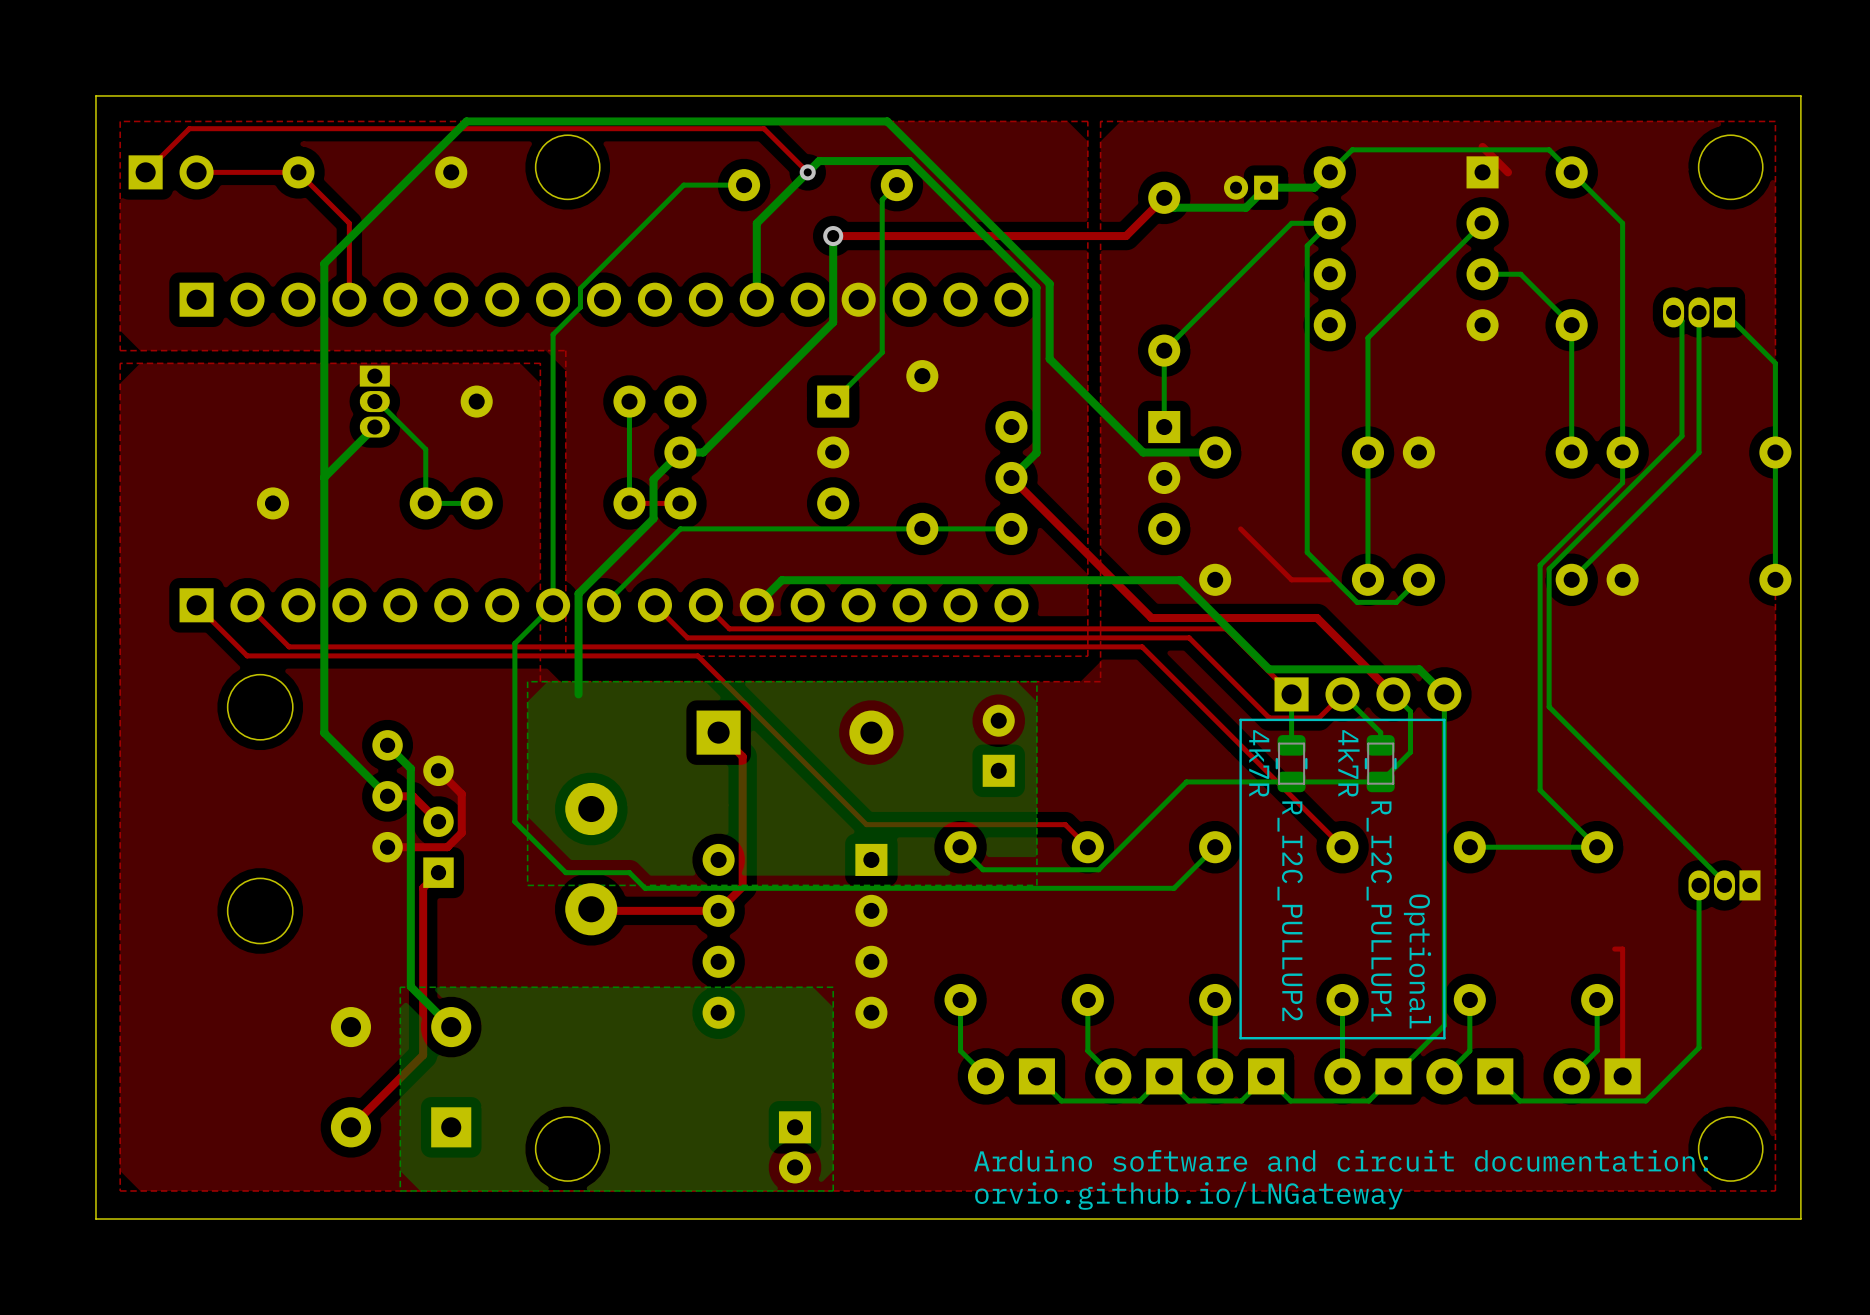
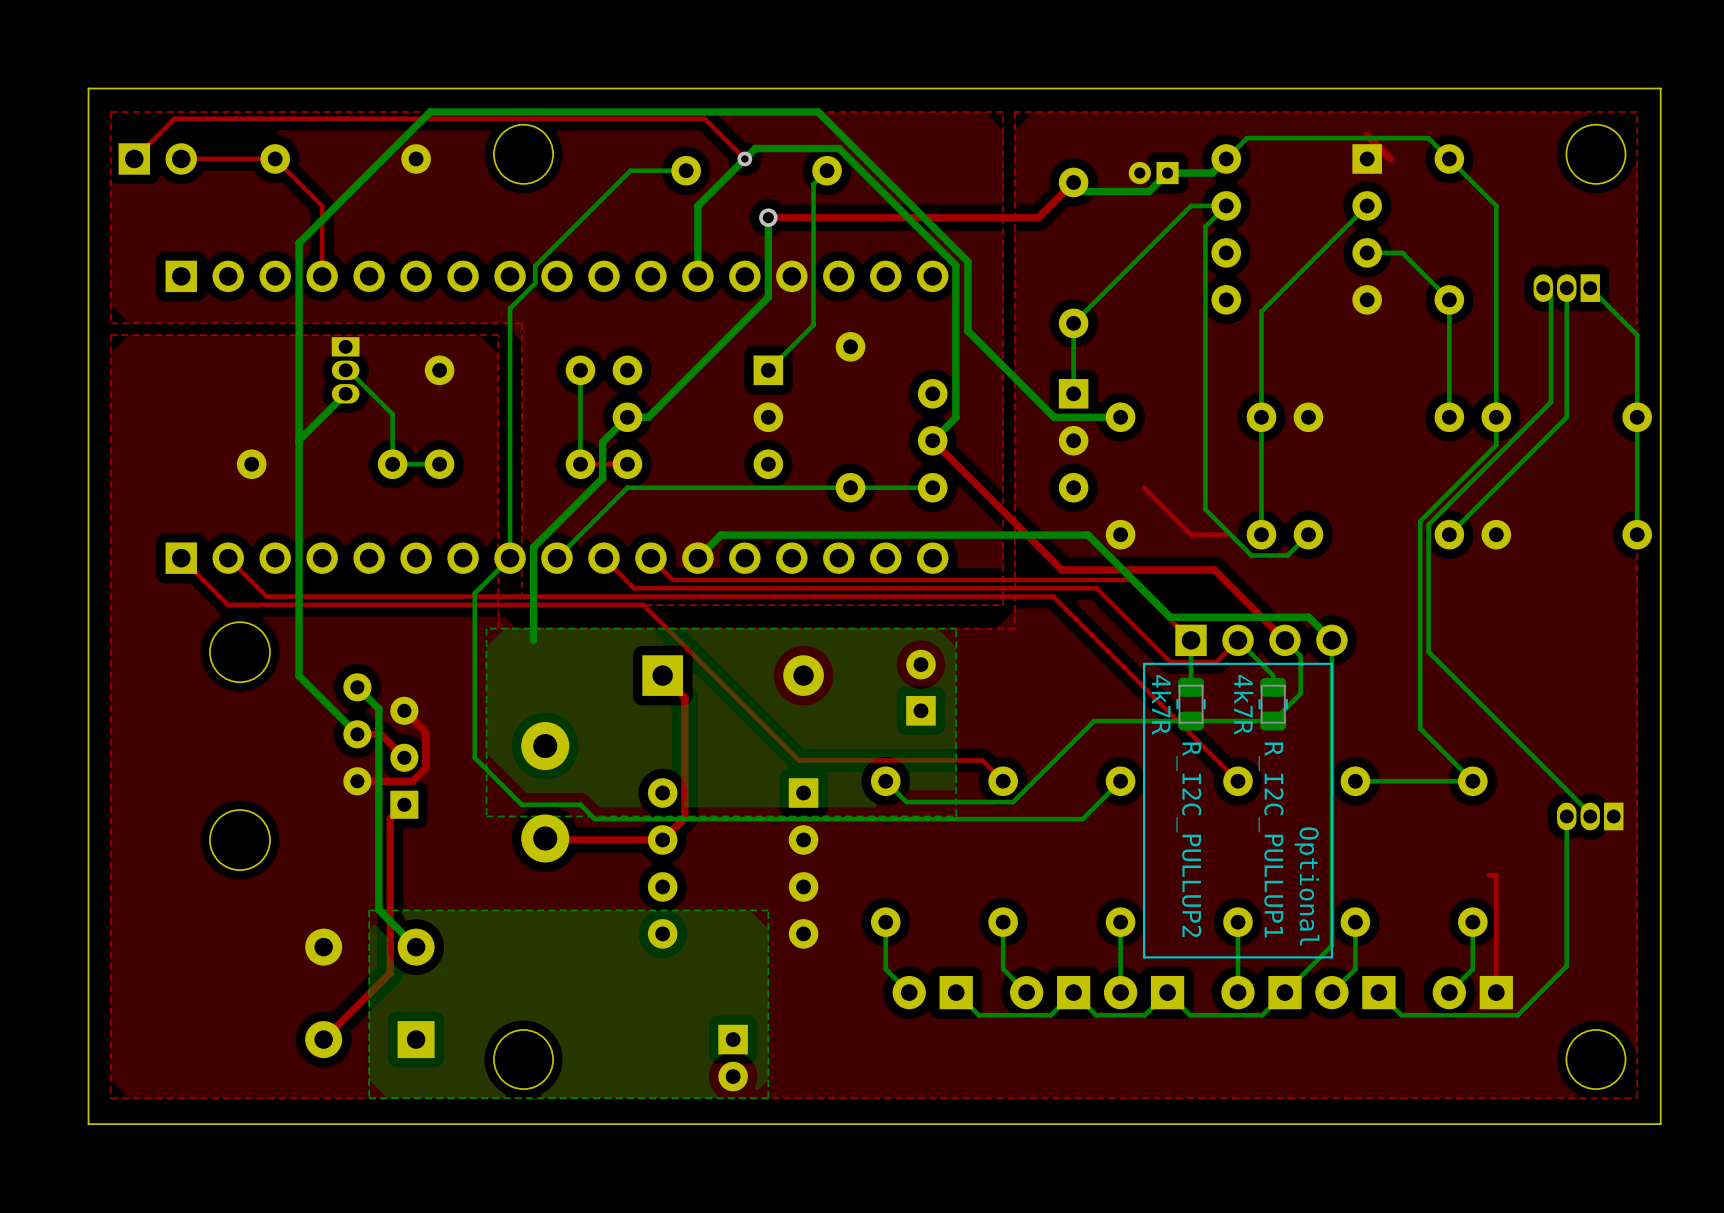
text: Arduino software and circuit documentation: (1341, 1160) -> none
text: orvio.github.io/LNGateway (1188, 1195) -> none

